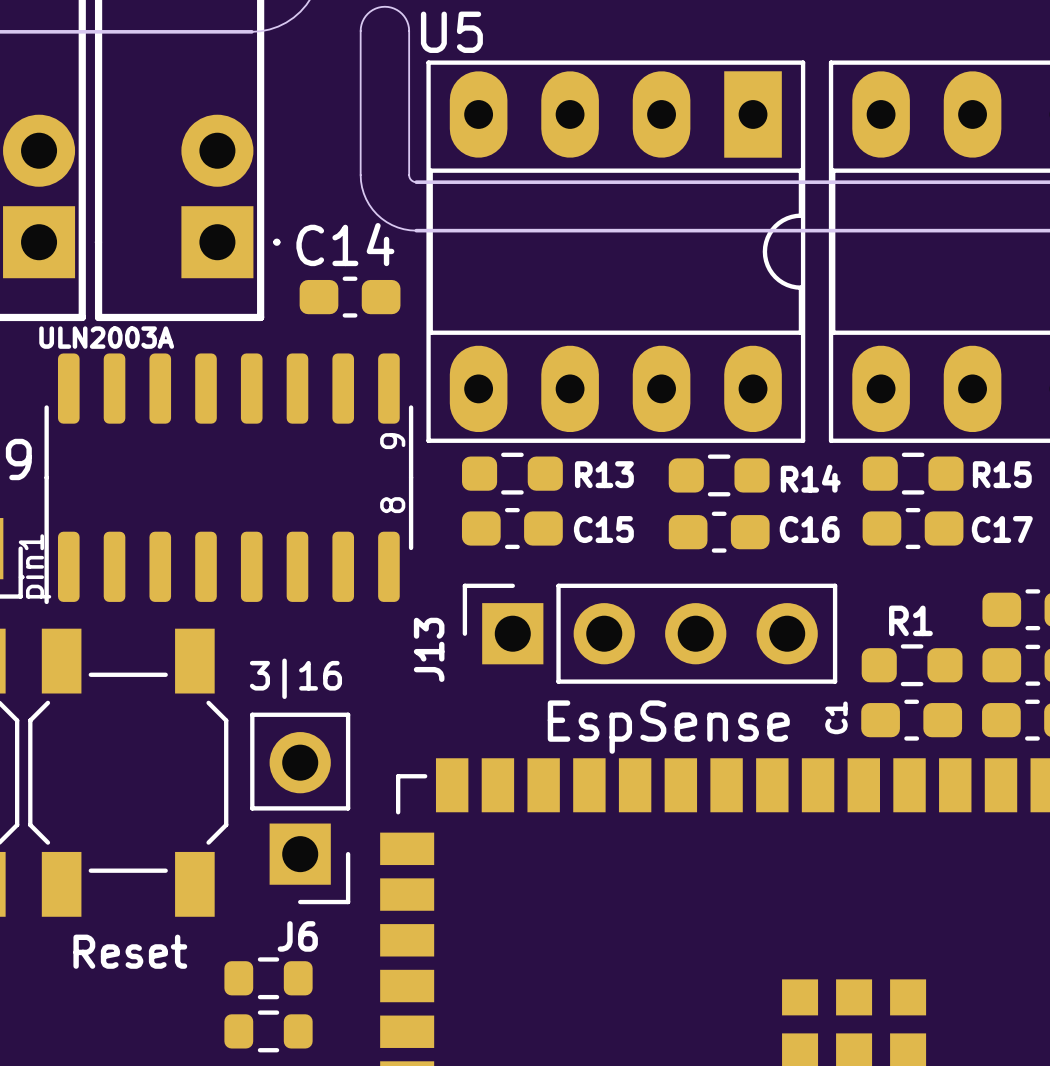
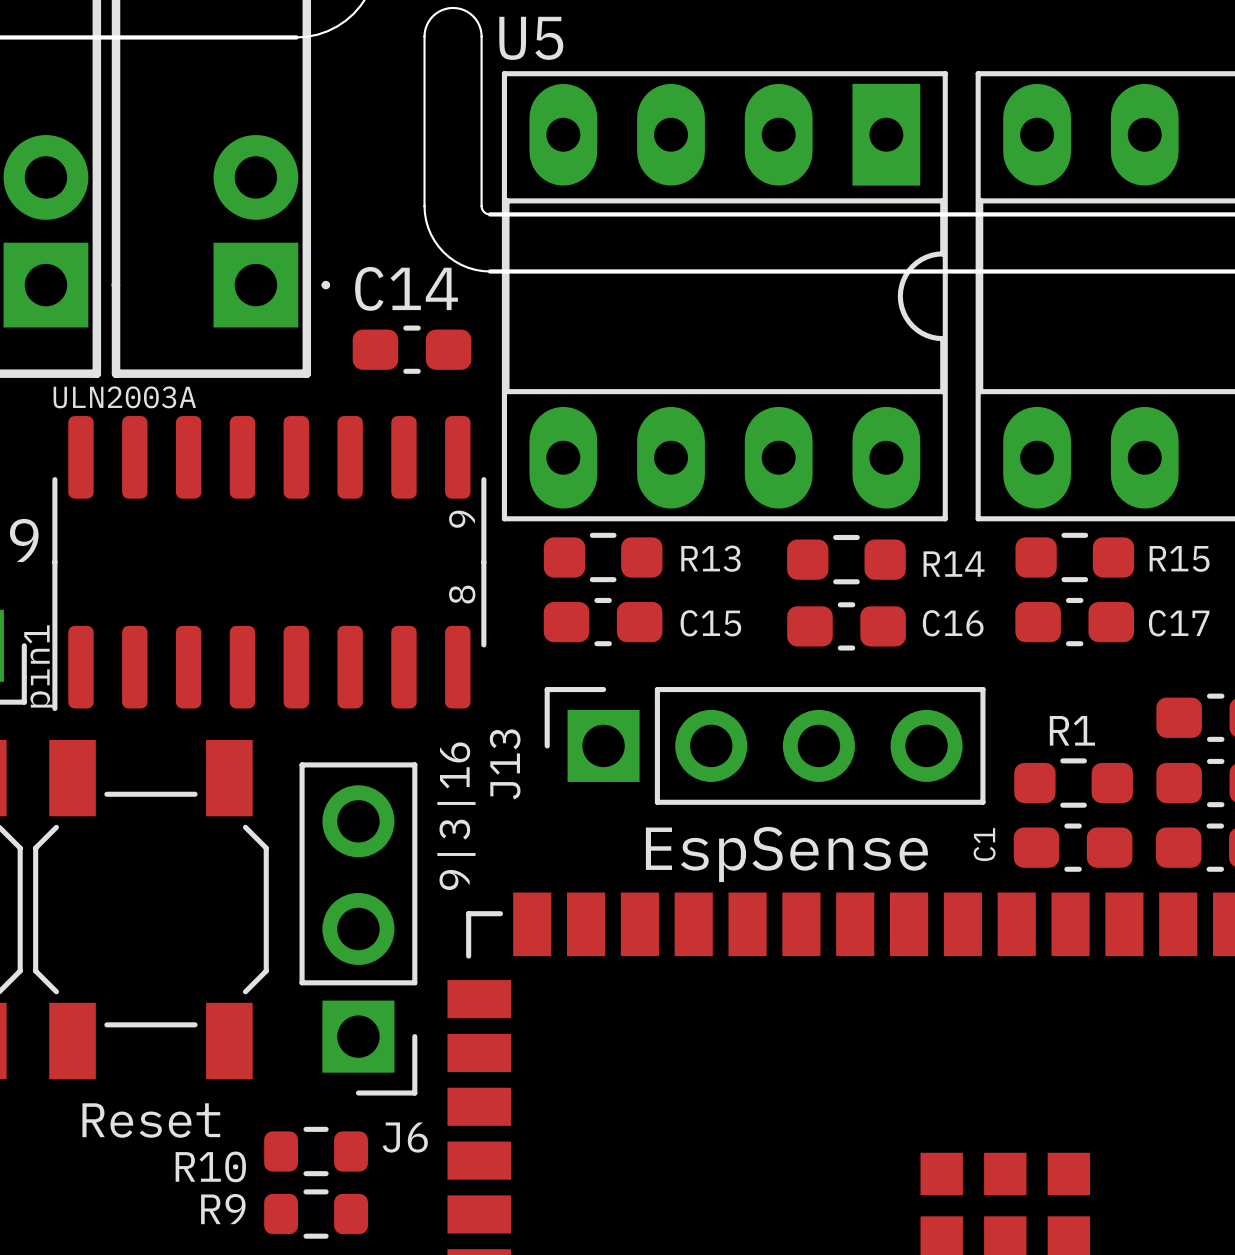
J6 footprint: [250, 712, 351, 905] -> [299, 762, 418, 1096]
R10 name: none -> R10 (210, 1166)
R9 name: none -> R9 (223, 1209)

